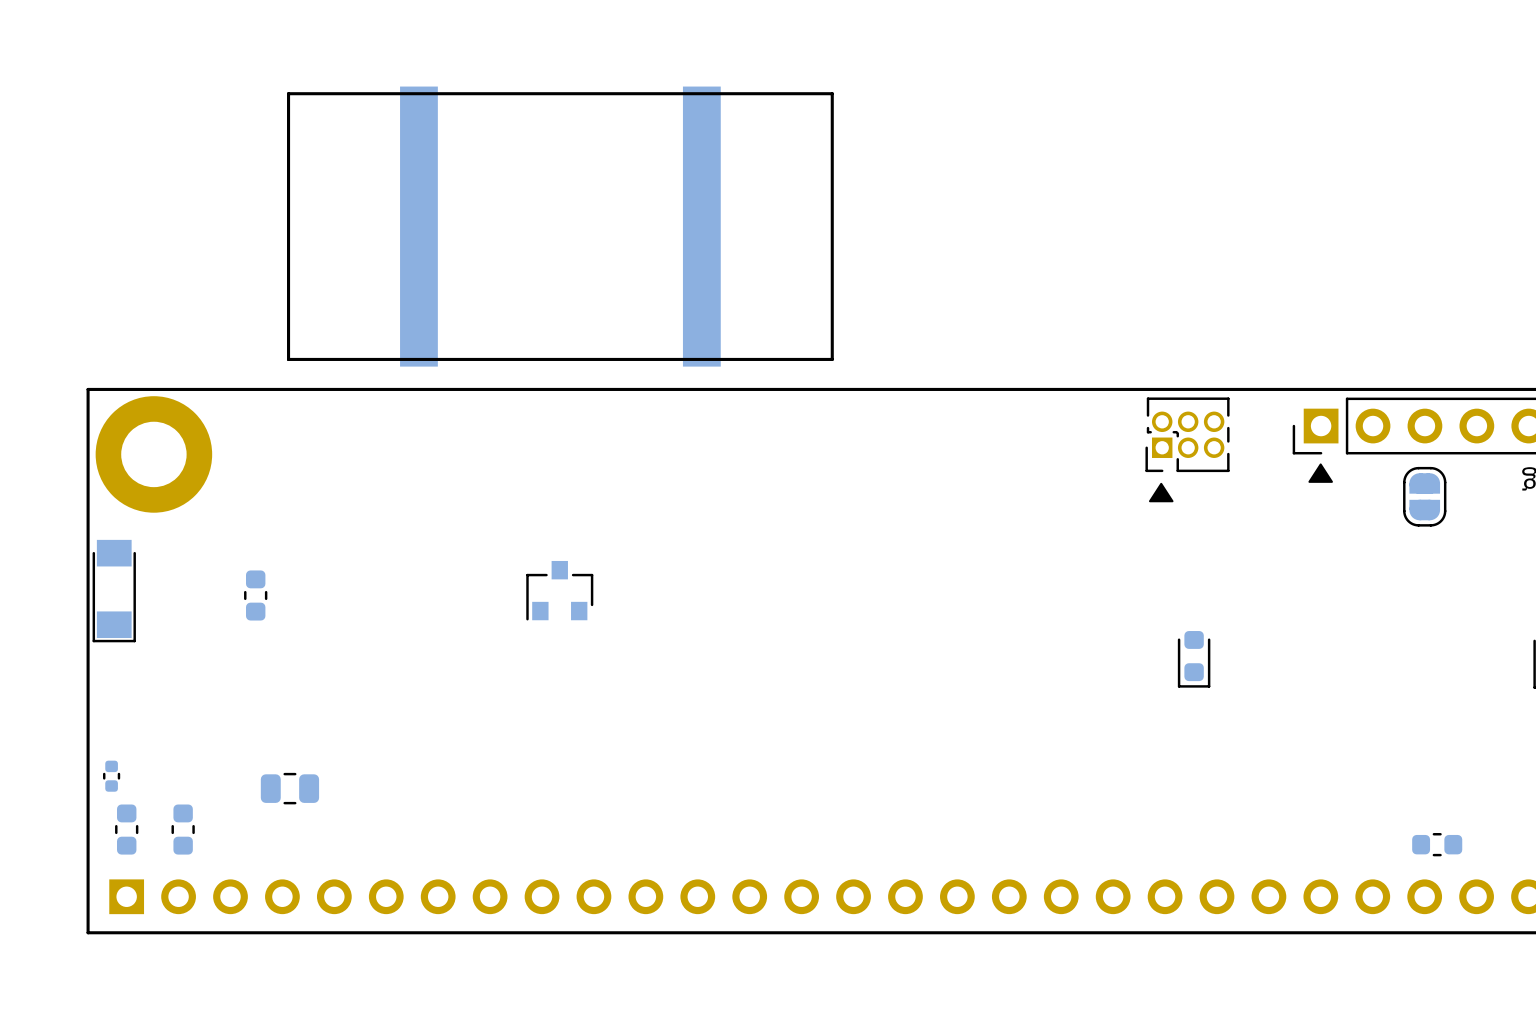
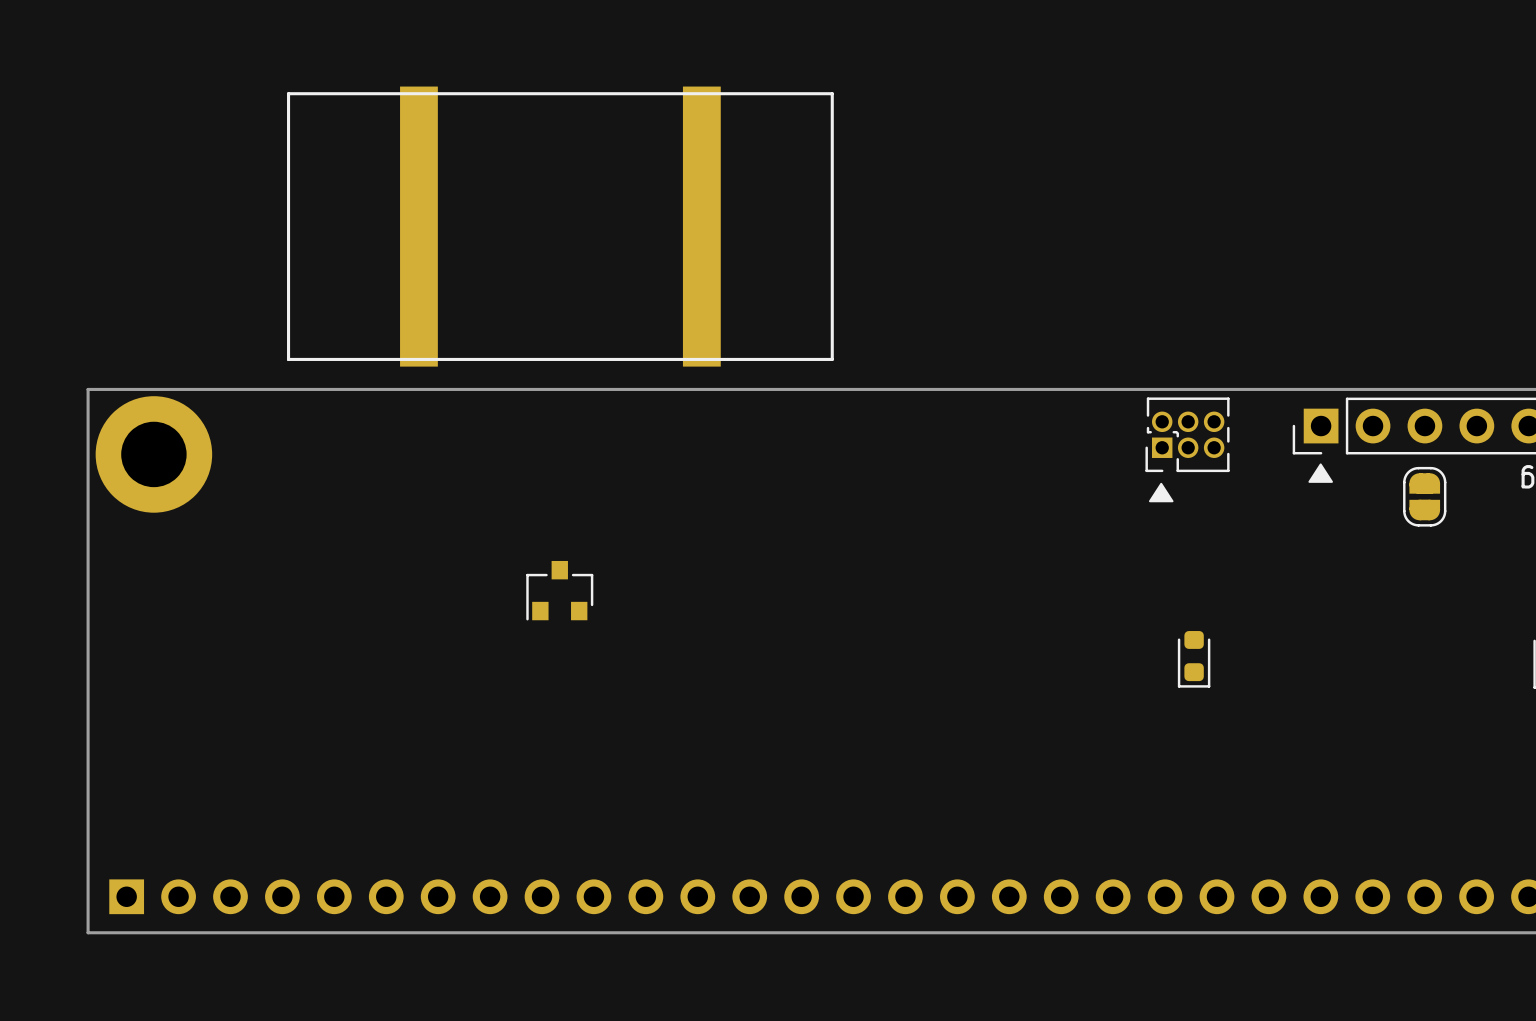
part: (114, 591) -> none
part: (255, 595) -> none
part: (111, 776) -> none
part: (289, 788) -> none
part: (126, 829) -> none
part: (183, 829) -> none
part: (1437, 844) -> none

